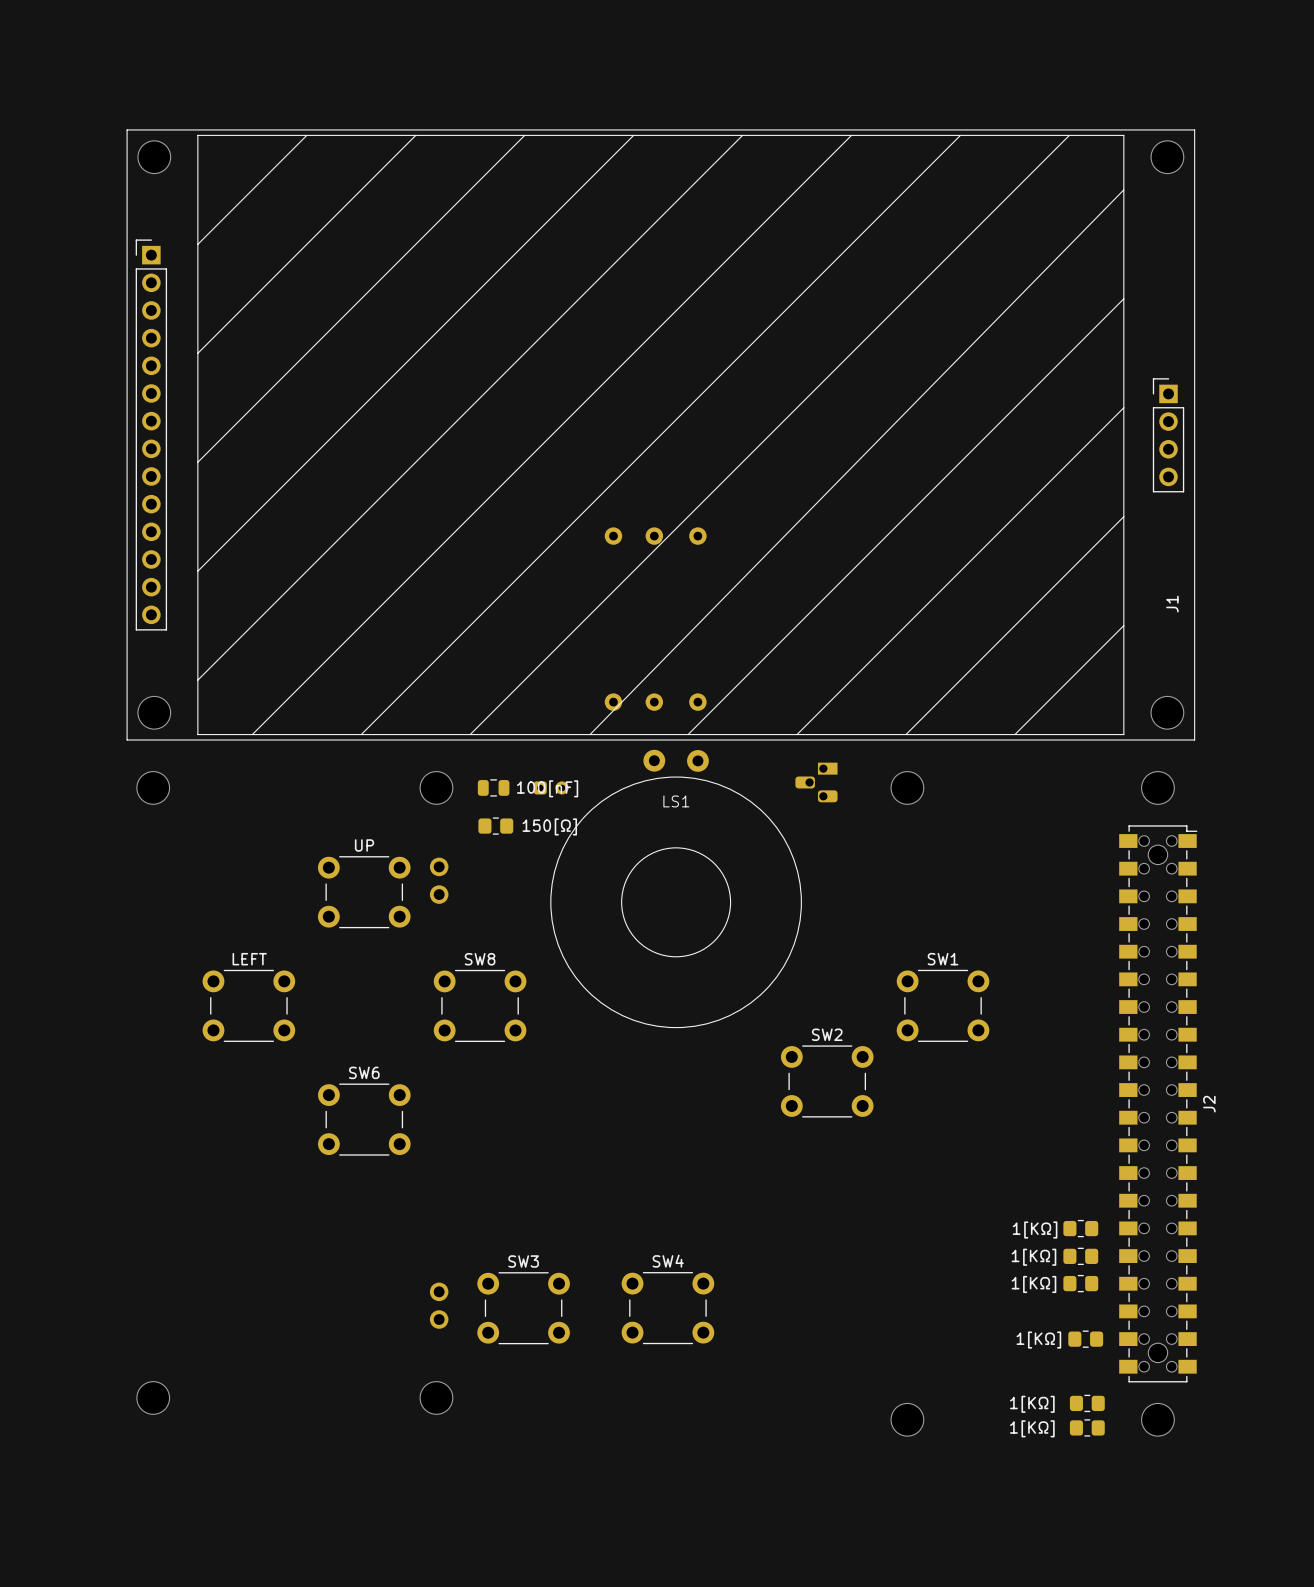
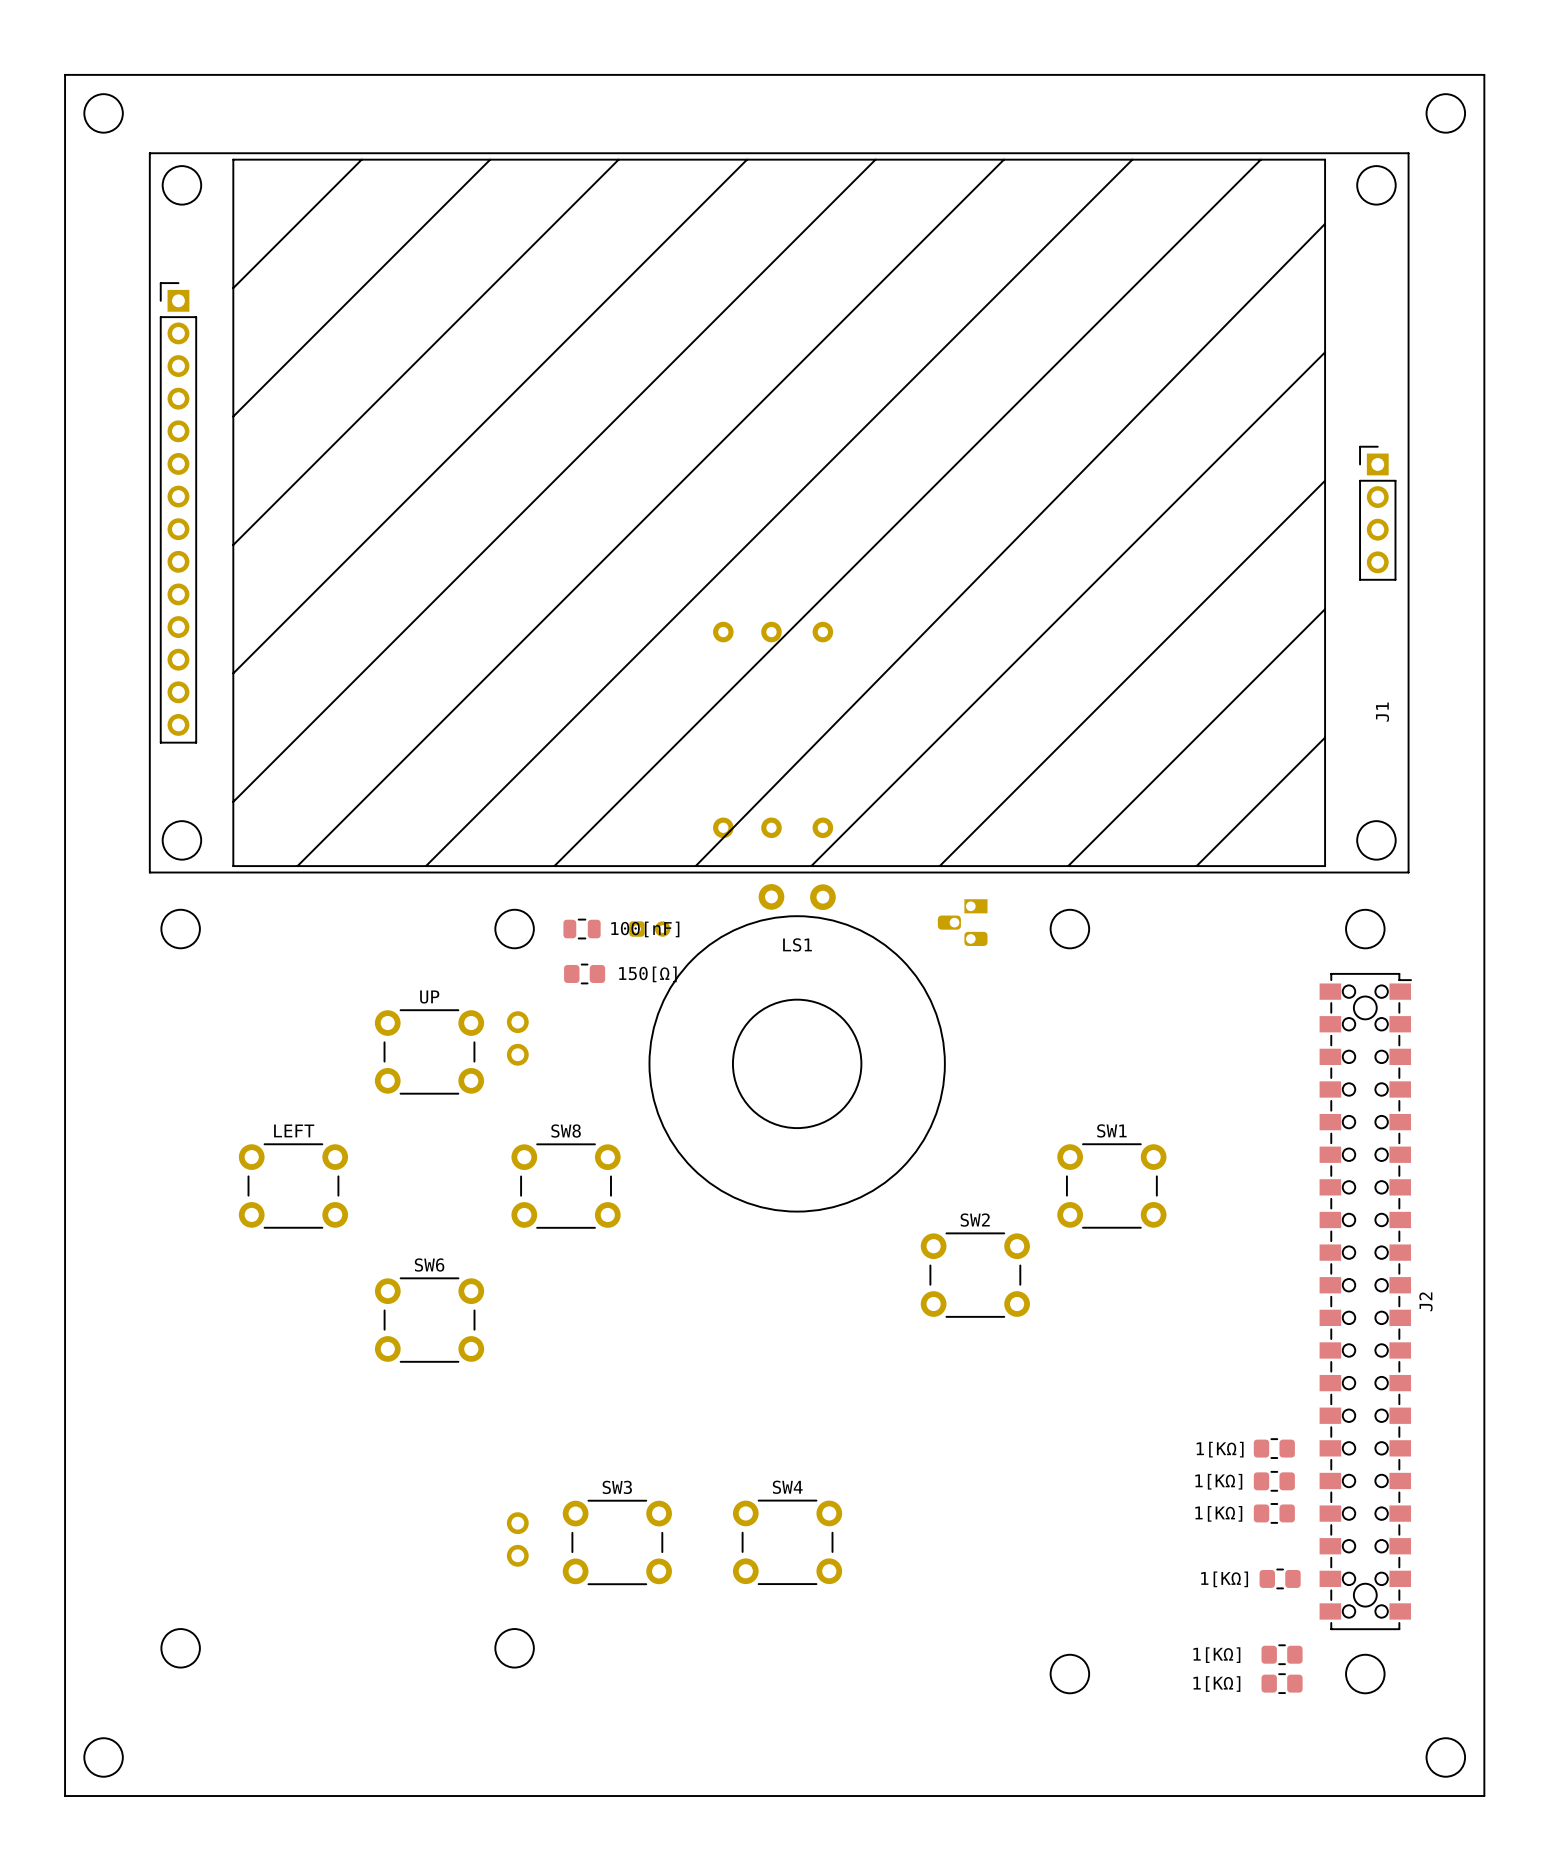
board edge: none -> (65, 74) (1484, 74) (1484, 1796) (65, 1796) (65, 74)
round board edge: none -> [84, 93, 124, 134]
round board edge: none -> [1426, 93, 1466, 134]
round board edge: none -> [84, 1737, 124, 1778]
round board edge: none -> [1426, 1737, 1466, 1778]

